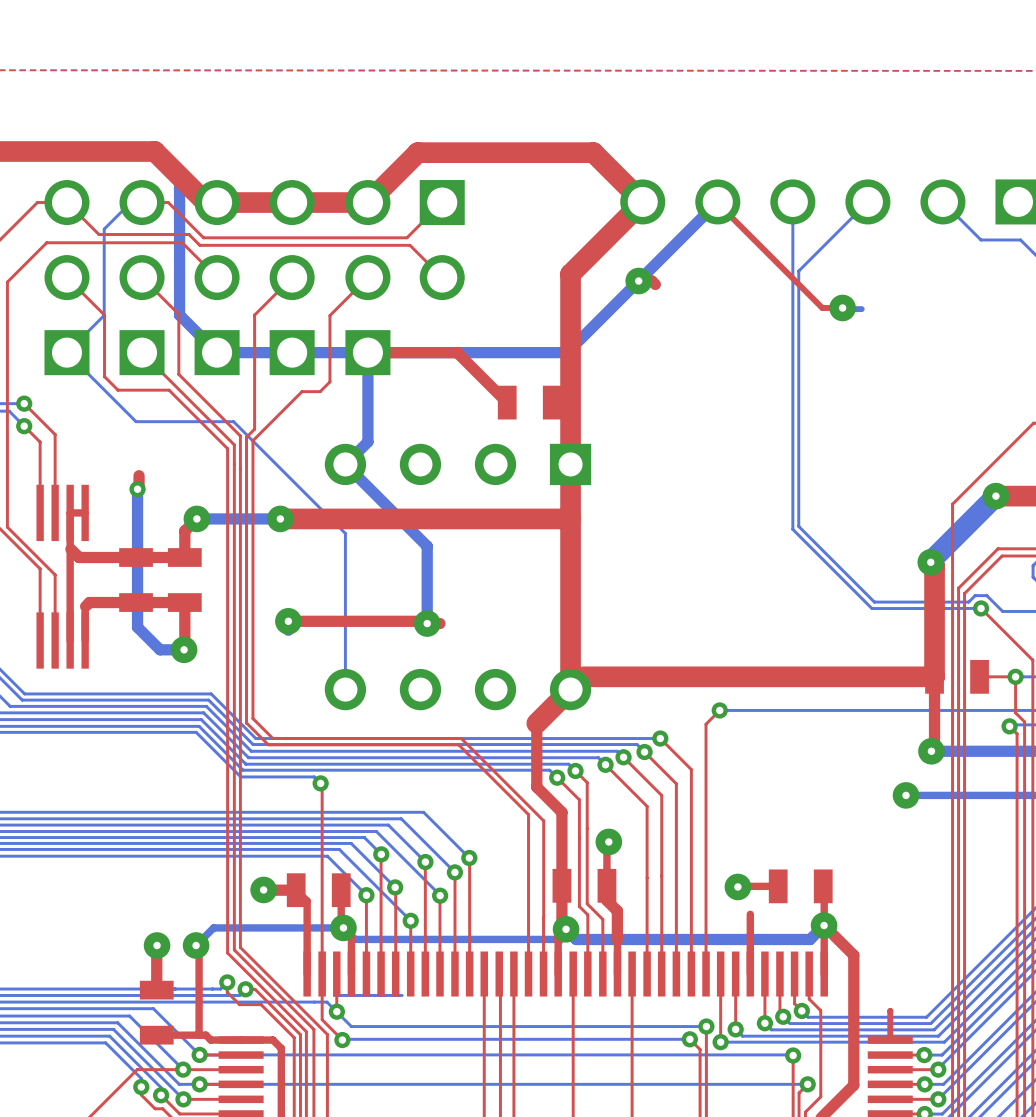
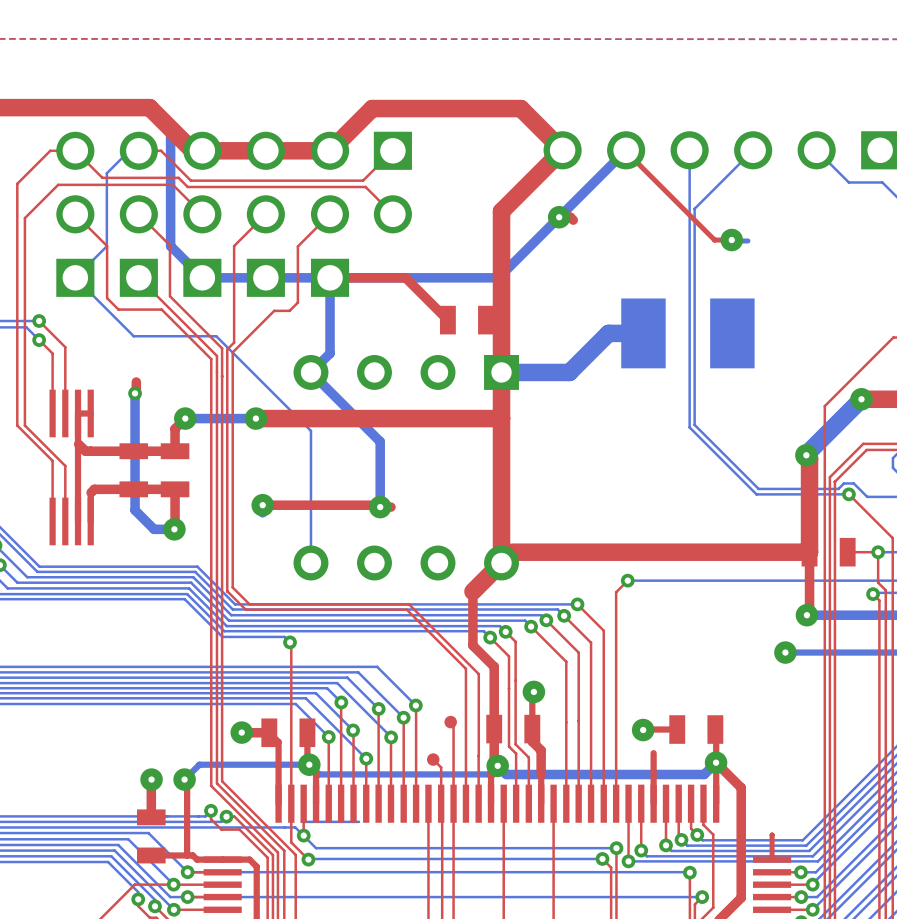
bottom track: none -> (643, 333) (608, 333) (569, 372) (501, 372)
part: none -> (687, 333)
top track: none -> (450, 722) (453, 724) (453, 803)
part: none -> (450, 722)
top track: none -> (433, 759) (441, 767) (441, 803)
part: none -> (433, 759)

